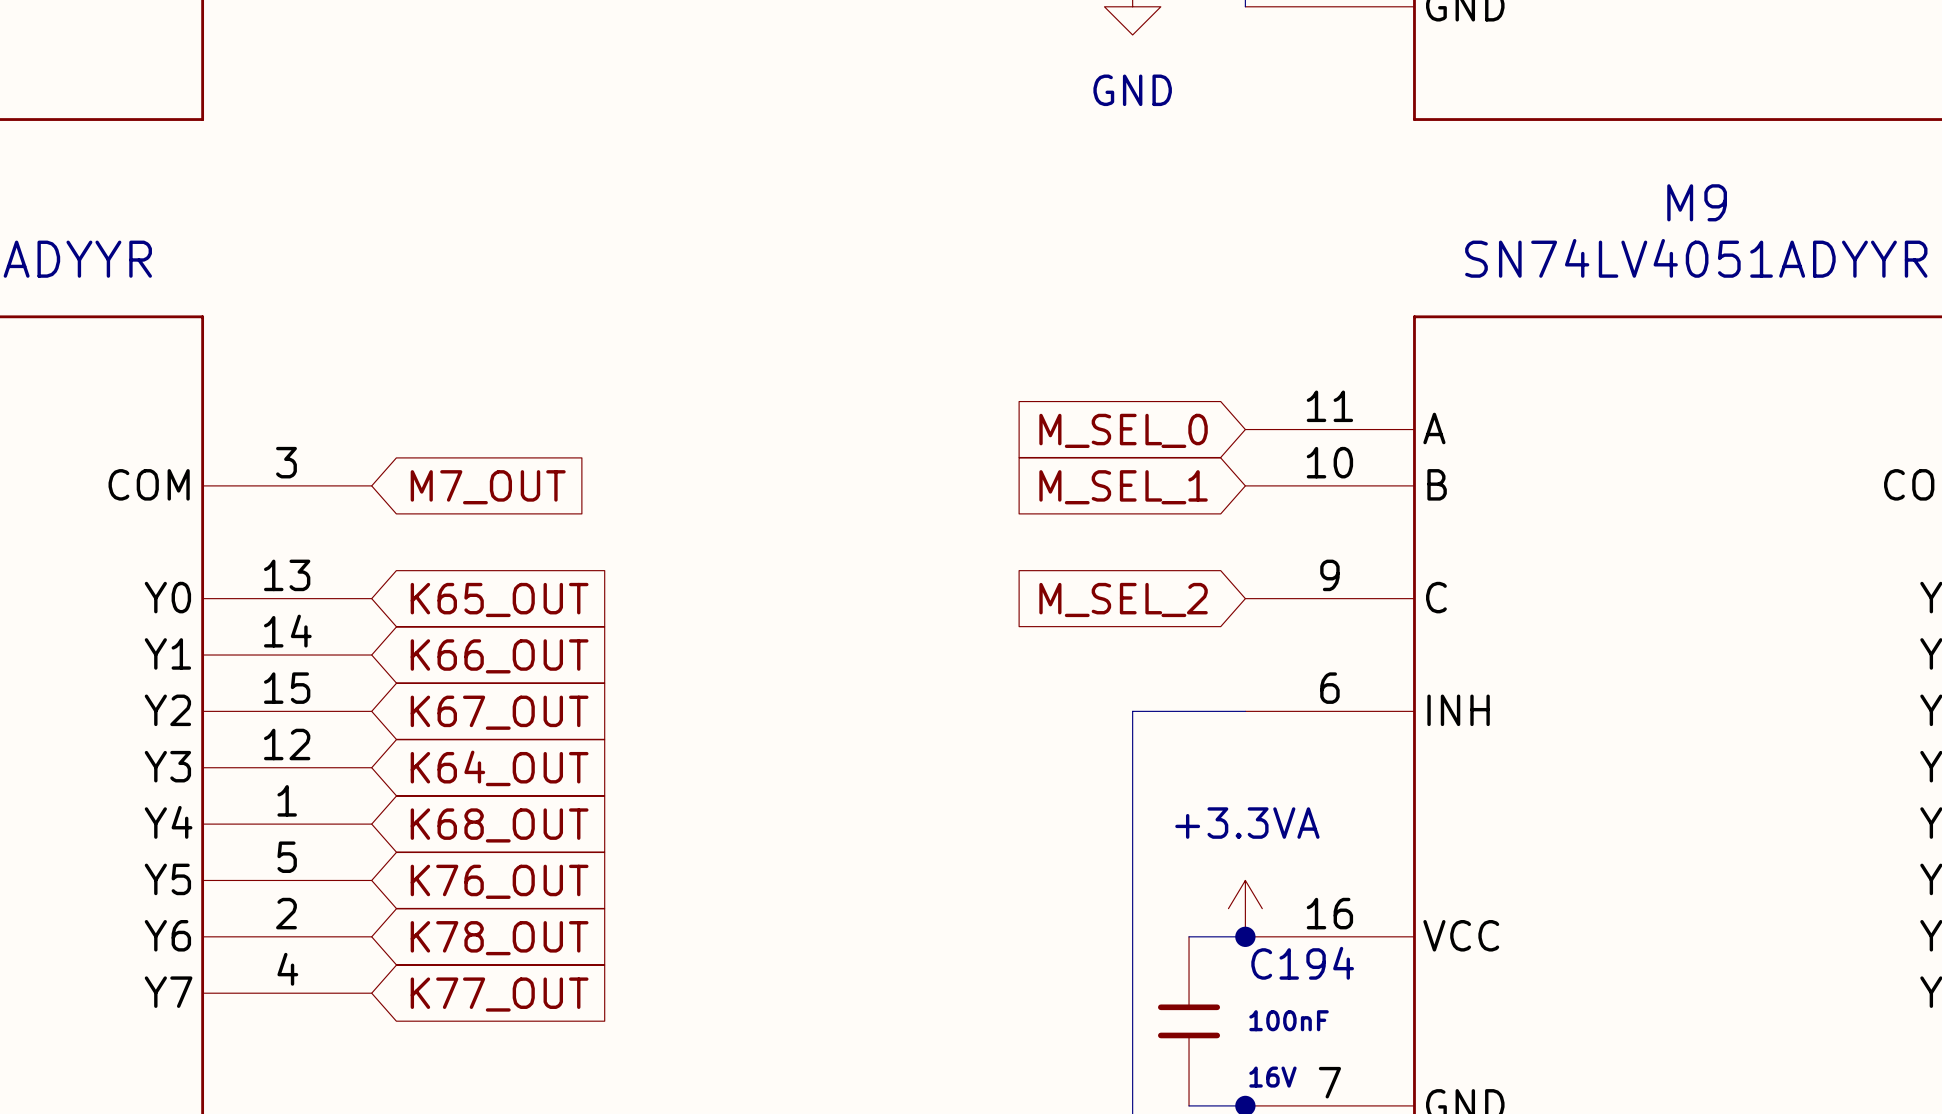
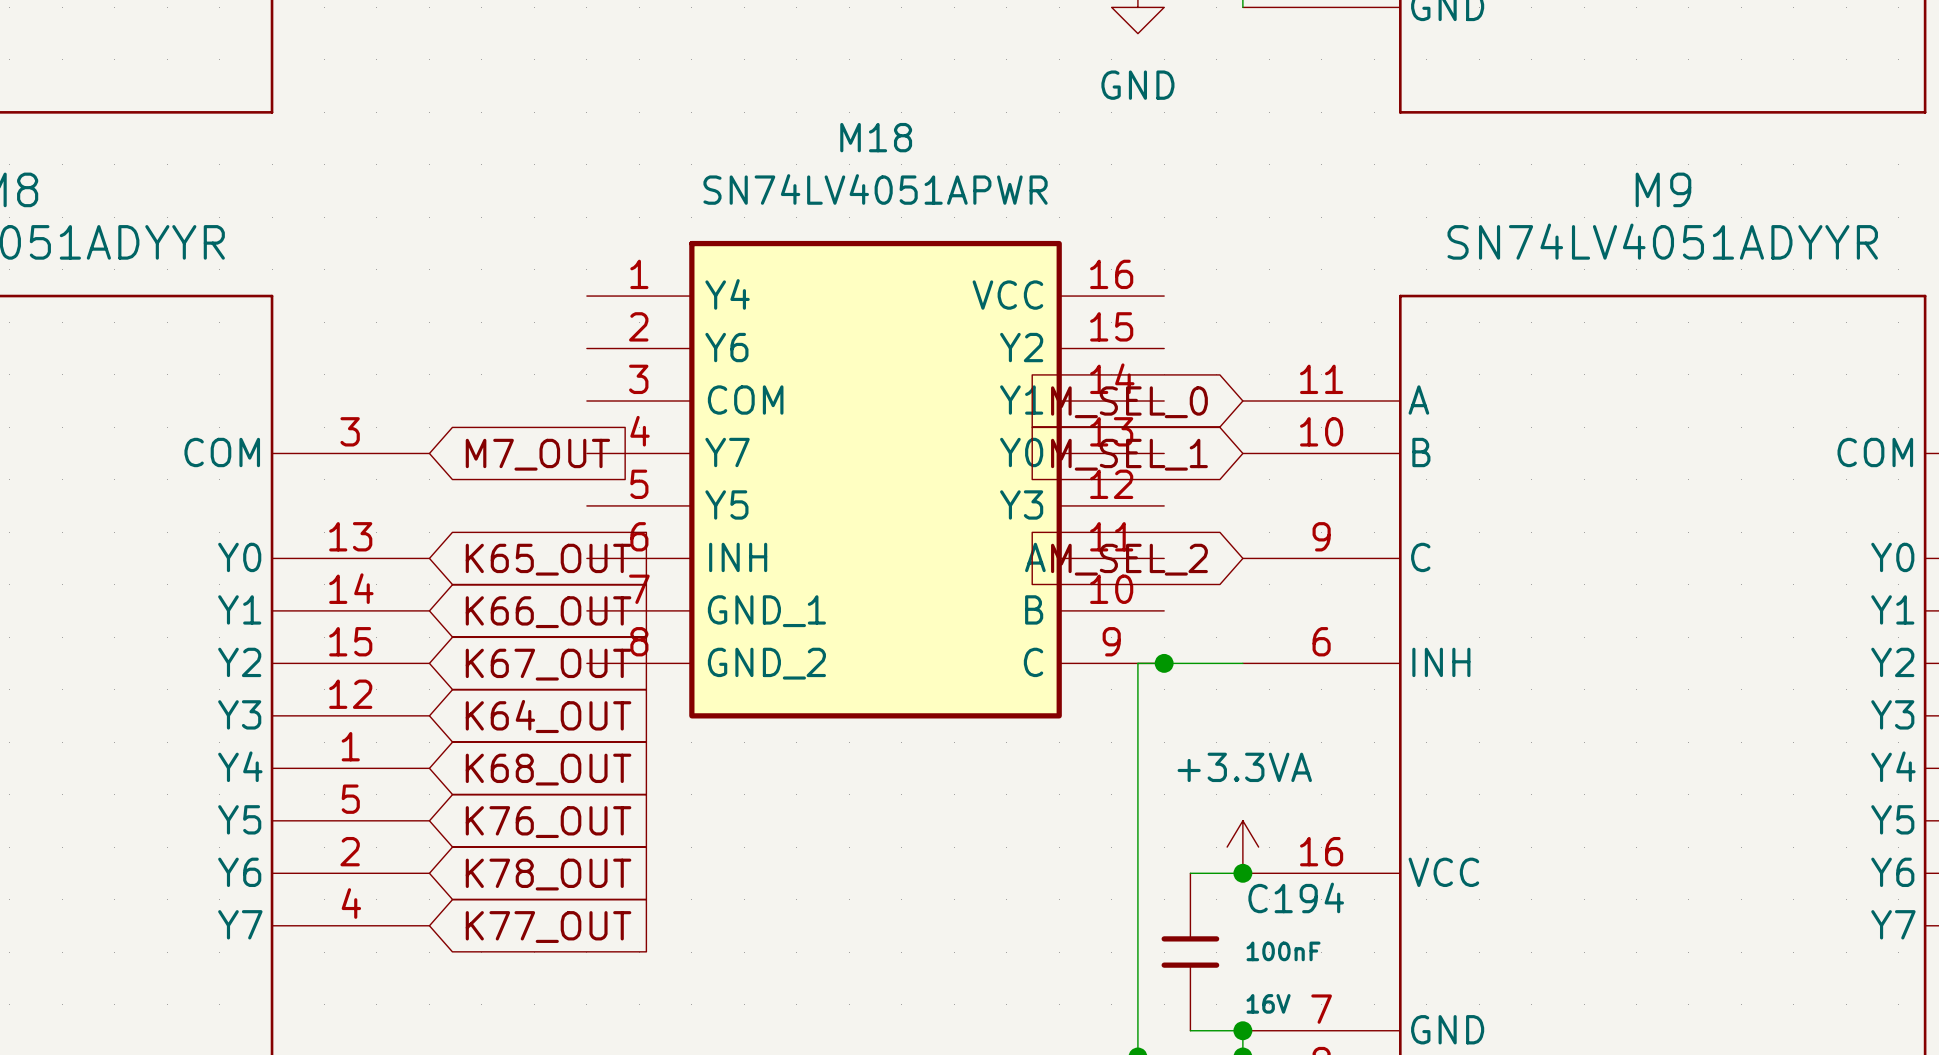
M18: none -> SN74LV4051APWR (875, 479)
junction: none -> (1164, 663)

